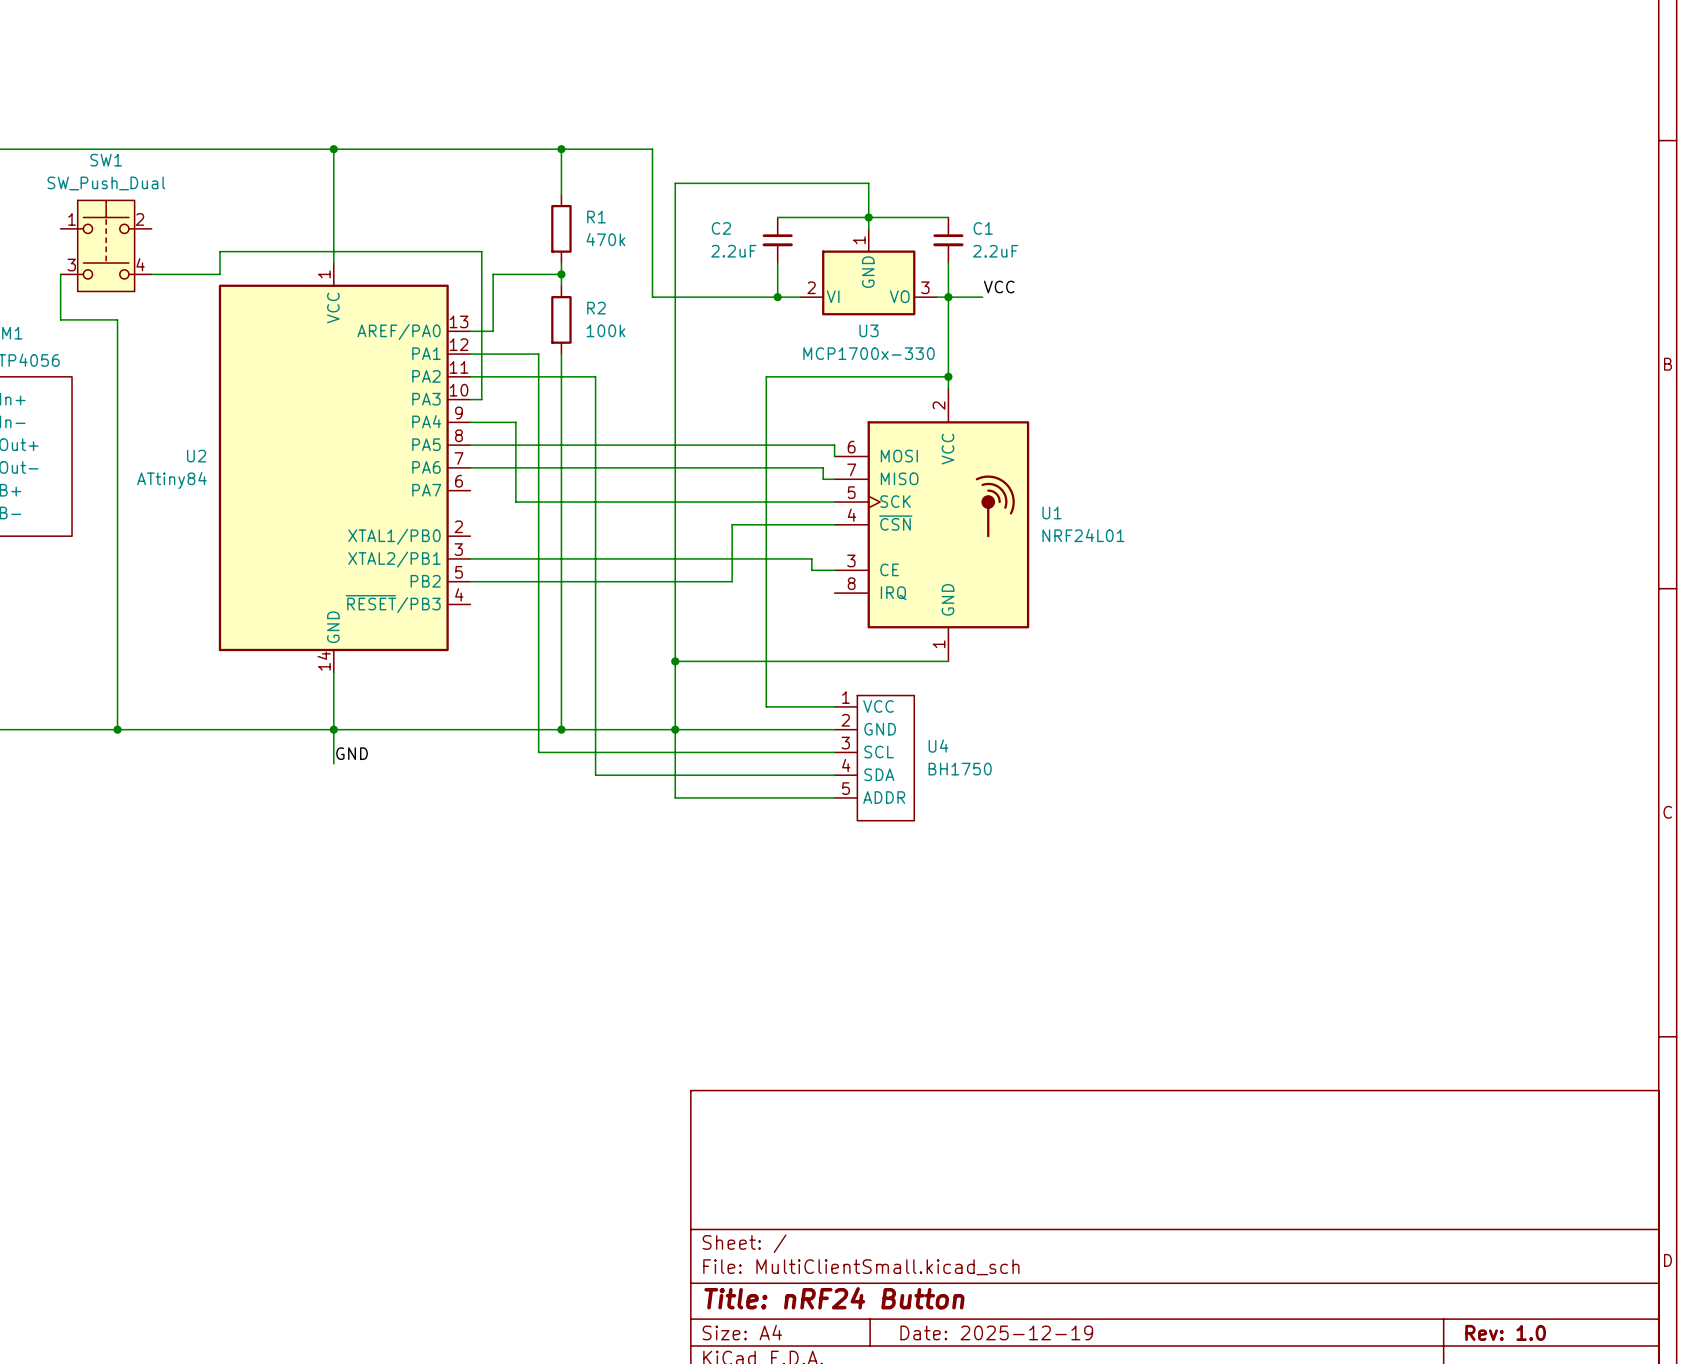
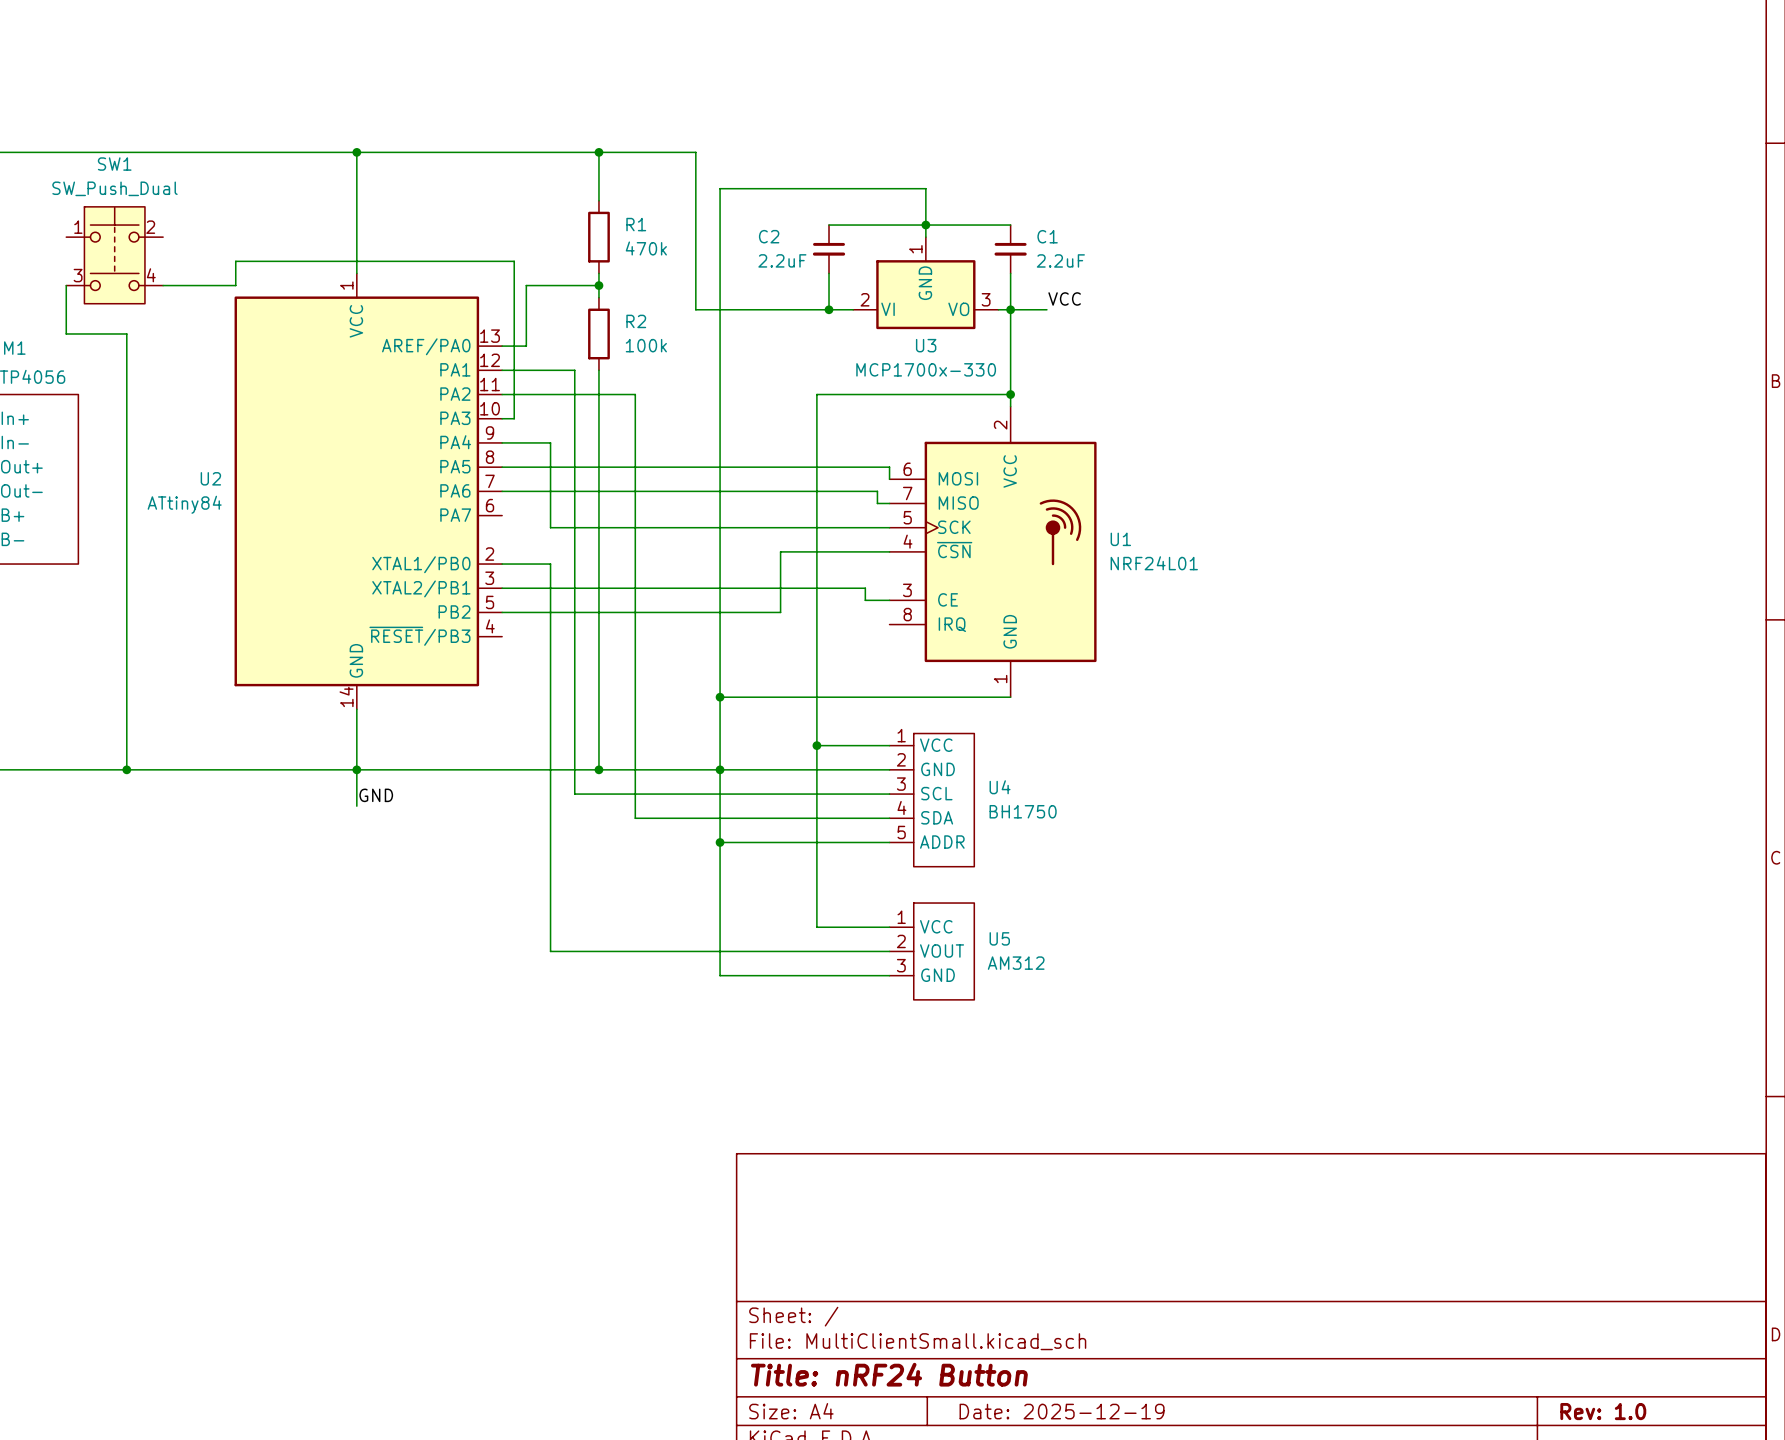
wire: none -> (502, 564) (550, 564) (550, 951) (889, 951)
wire: none -> (816, 745) (816, 927) (889, 927)
junction: none -> (816, 745)
wire: none -> (720, 842) (720, 975) (889, 975)
junction: none -> (720, 842)
U5: none -> AM312 (931, 951)

